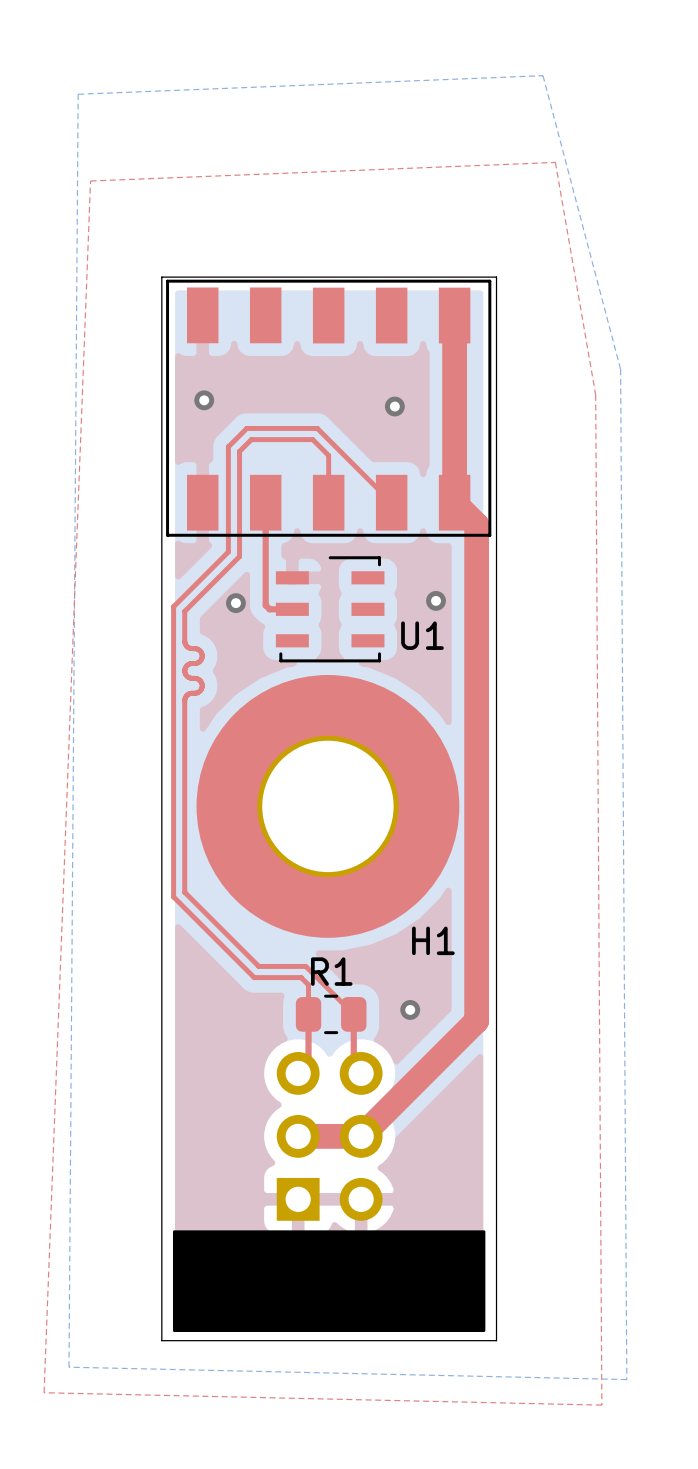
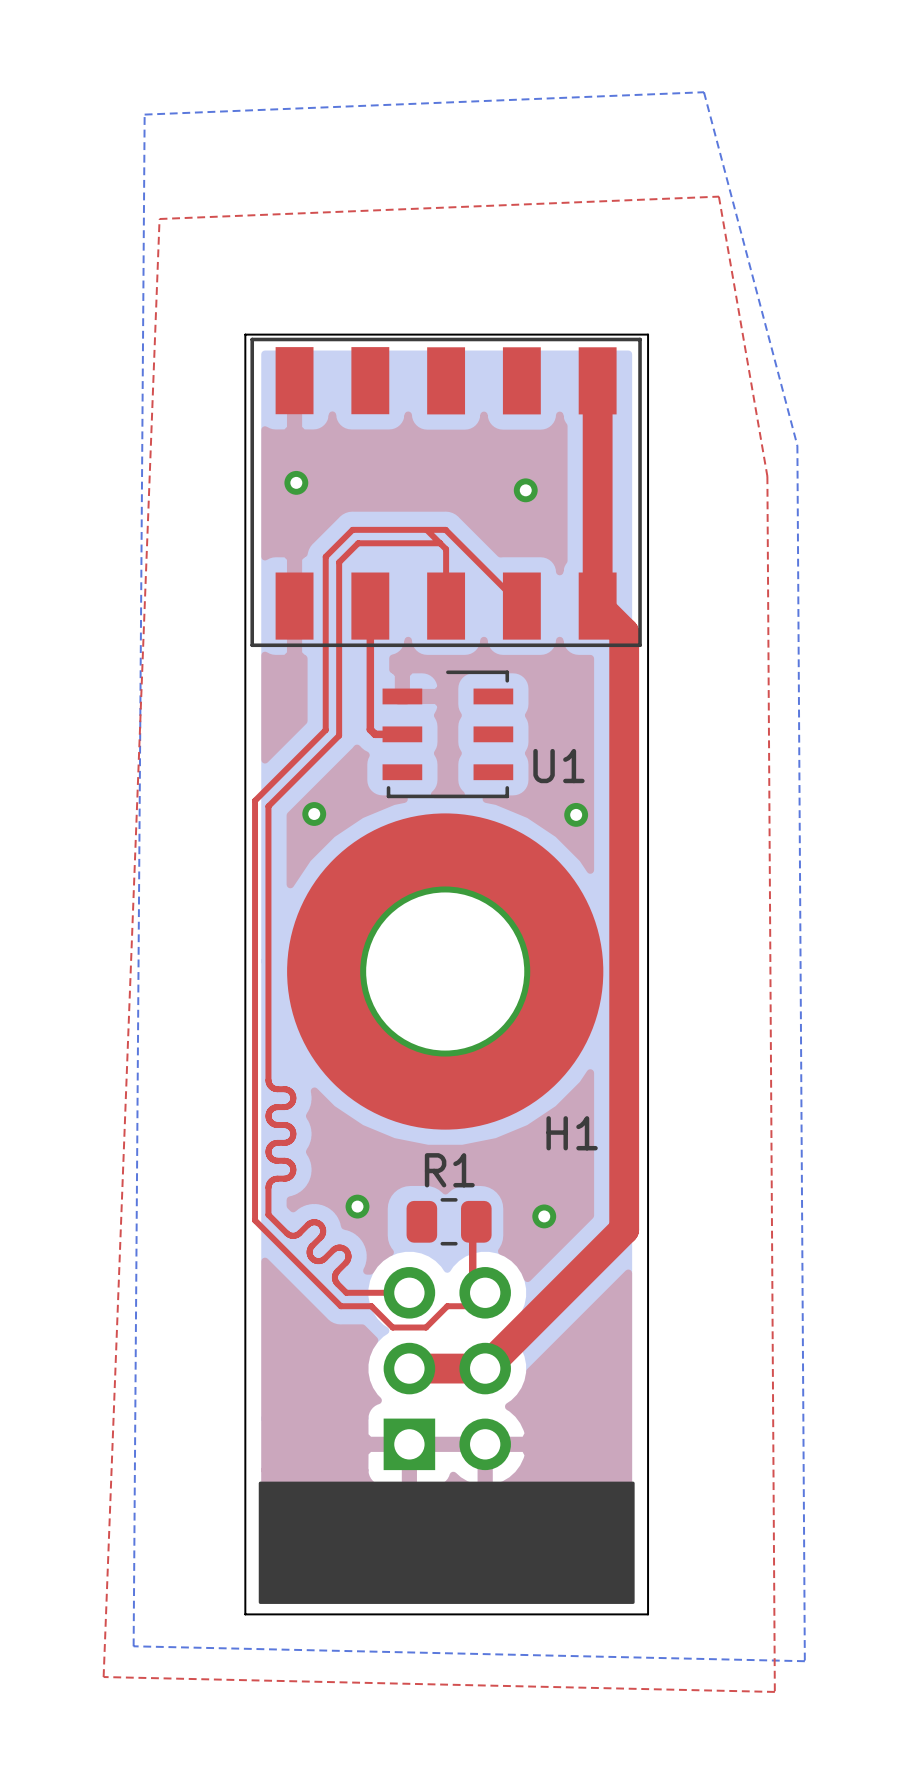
top track: (251, 439) (239, 451) (239, 556) (184, 611) (185, 644) (188, 647) (199, 650) (202, 656) (198, 662) (187, 665) (184, 670) (188, 677) (199, 679) (202, 685) (198, 692) (187, 694) (184, 700) (184, 892) (258, 966) (305, 966) (353, 1014) (353, 1066) -> (472, 1222) (472, 1280) (476, 1283)
top track: (328, 439) (317, 428) (246, 428) (228, 446) (228, 461) -> (352, 529) (325, 556)
top track: none -> (440, 543) (358, 543) (339, 562) (339, 735) (268, 806) (268, 1080) (273, 1088) (290, 1091) (293, 1098) (290, 1105) (273, 1107) (268, 1114) (271, 1123) (288, 1125) (293, 1133) (288, 1142) (271, 1144) (268, 1149) (269, 1155) (275, 1160) (288, 1161) (293, 1169) (288, 1177) (275, 1178) (269, 1183) (268, 1214) (286, 1233) (292, 1235) (297, 1234) (311, 1222) (320, 1224) (322, 1234) (310, 1247) (310, 1255) (313, 1259) (319, 1261) (336, 1248) (345, 1250) (348, 1259) (336, 1272) (334, 1278) (346, 1292) (409, 1292)
top track: (228, 551) (173, 606) (173, 896) (254, 977) (301, 977) (308, 984) (308, 1063) (305, 1066) -> (325, 665) (325, 730) (255, 800) (255, 1220) (340, 1306) (371, 1306) (392, 1327) (426, 1327) (447, 1306) (471, 1306) (485, 1292)
via position: (436, 600) -> (576, 814)
via position: (235, 603) -> (314, 814)
via: none -> (357, 1206)

